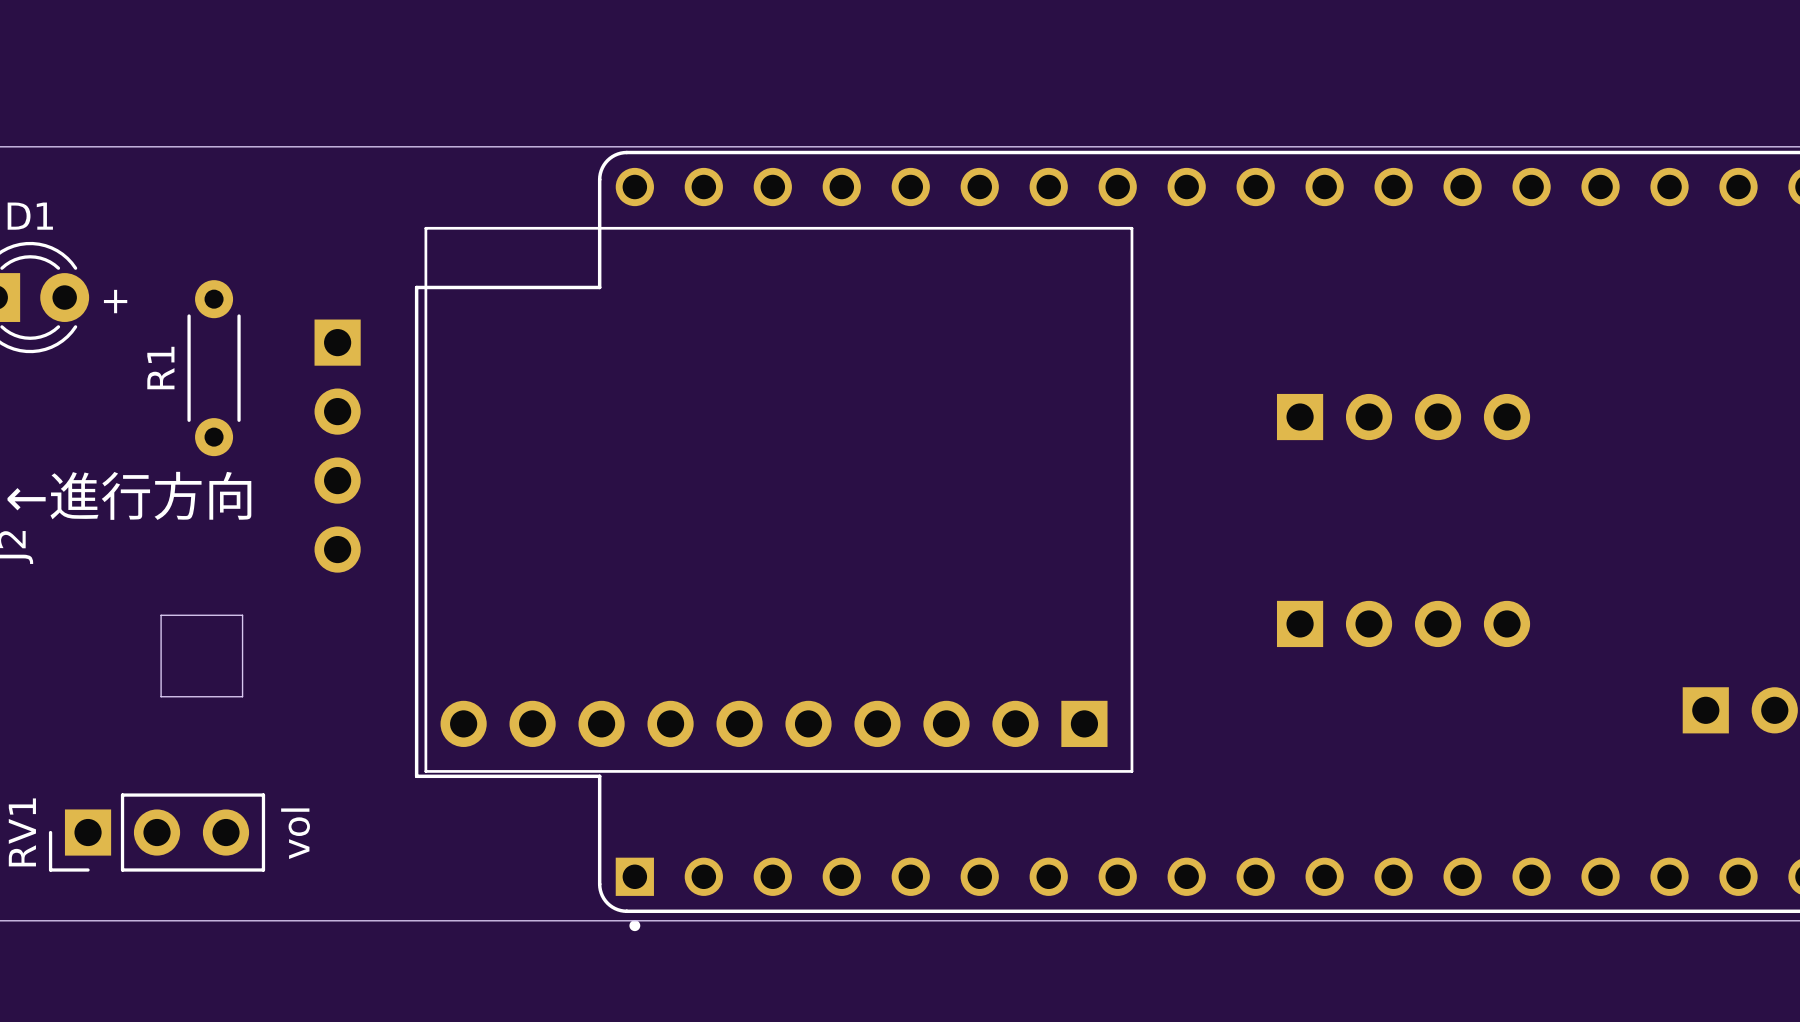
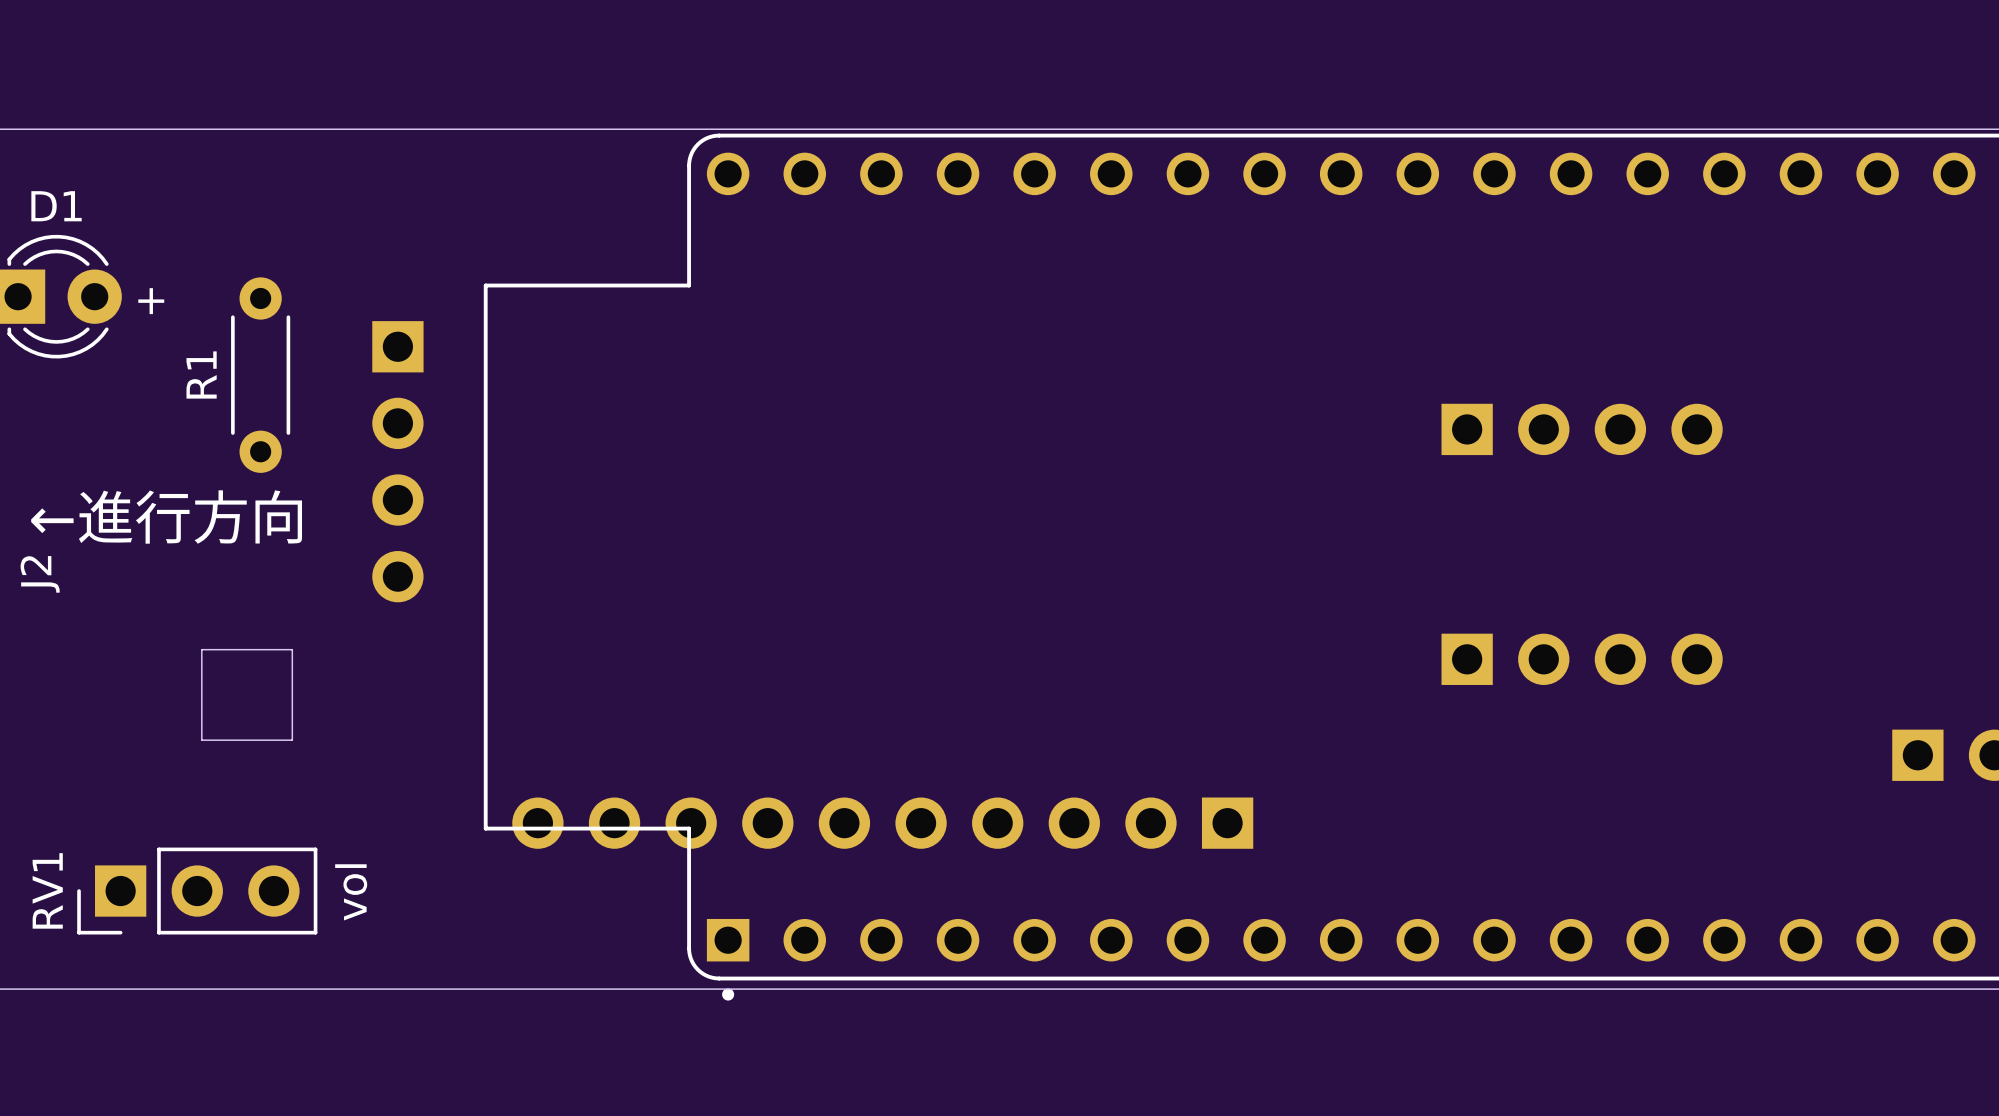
line: (425, 228) (1131, 228) (1131, 771) (425, 771) (425, 228) -> none
part position: (774, 723) -> (882, 823)

